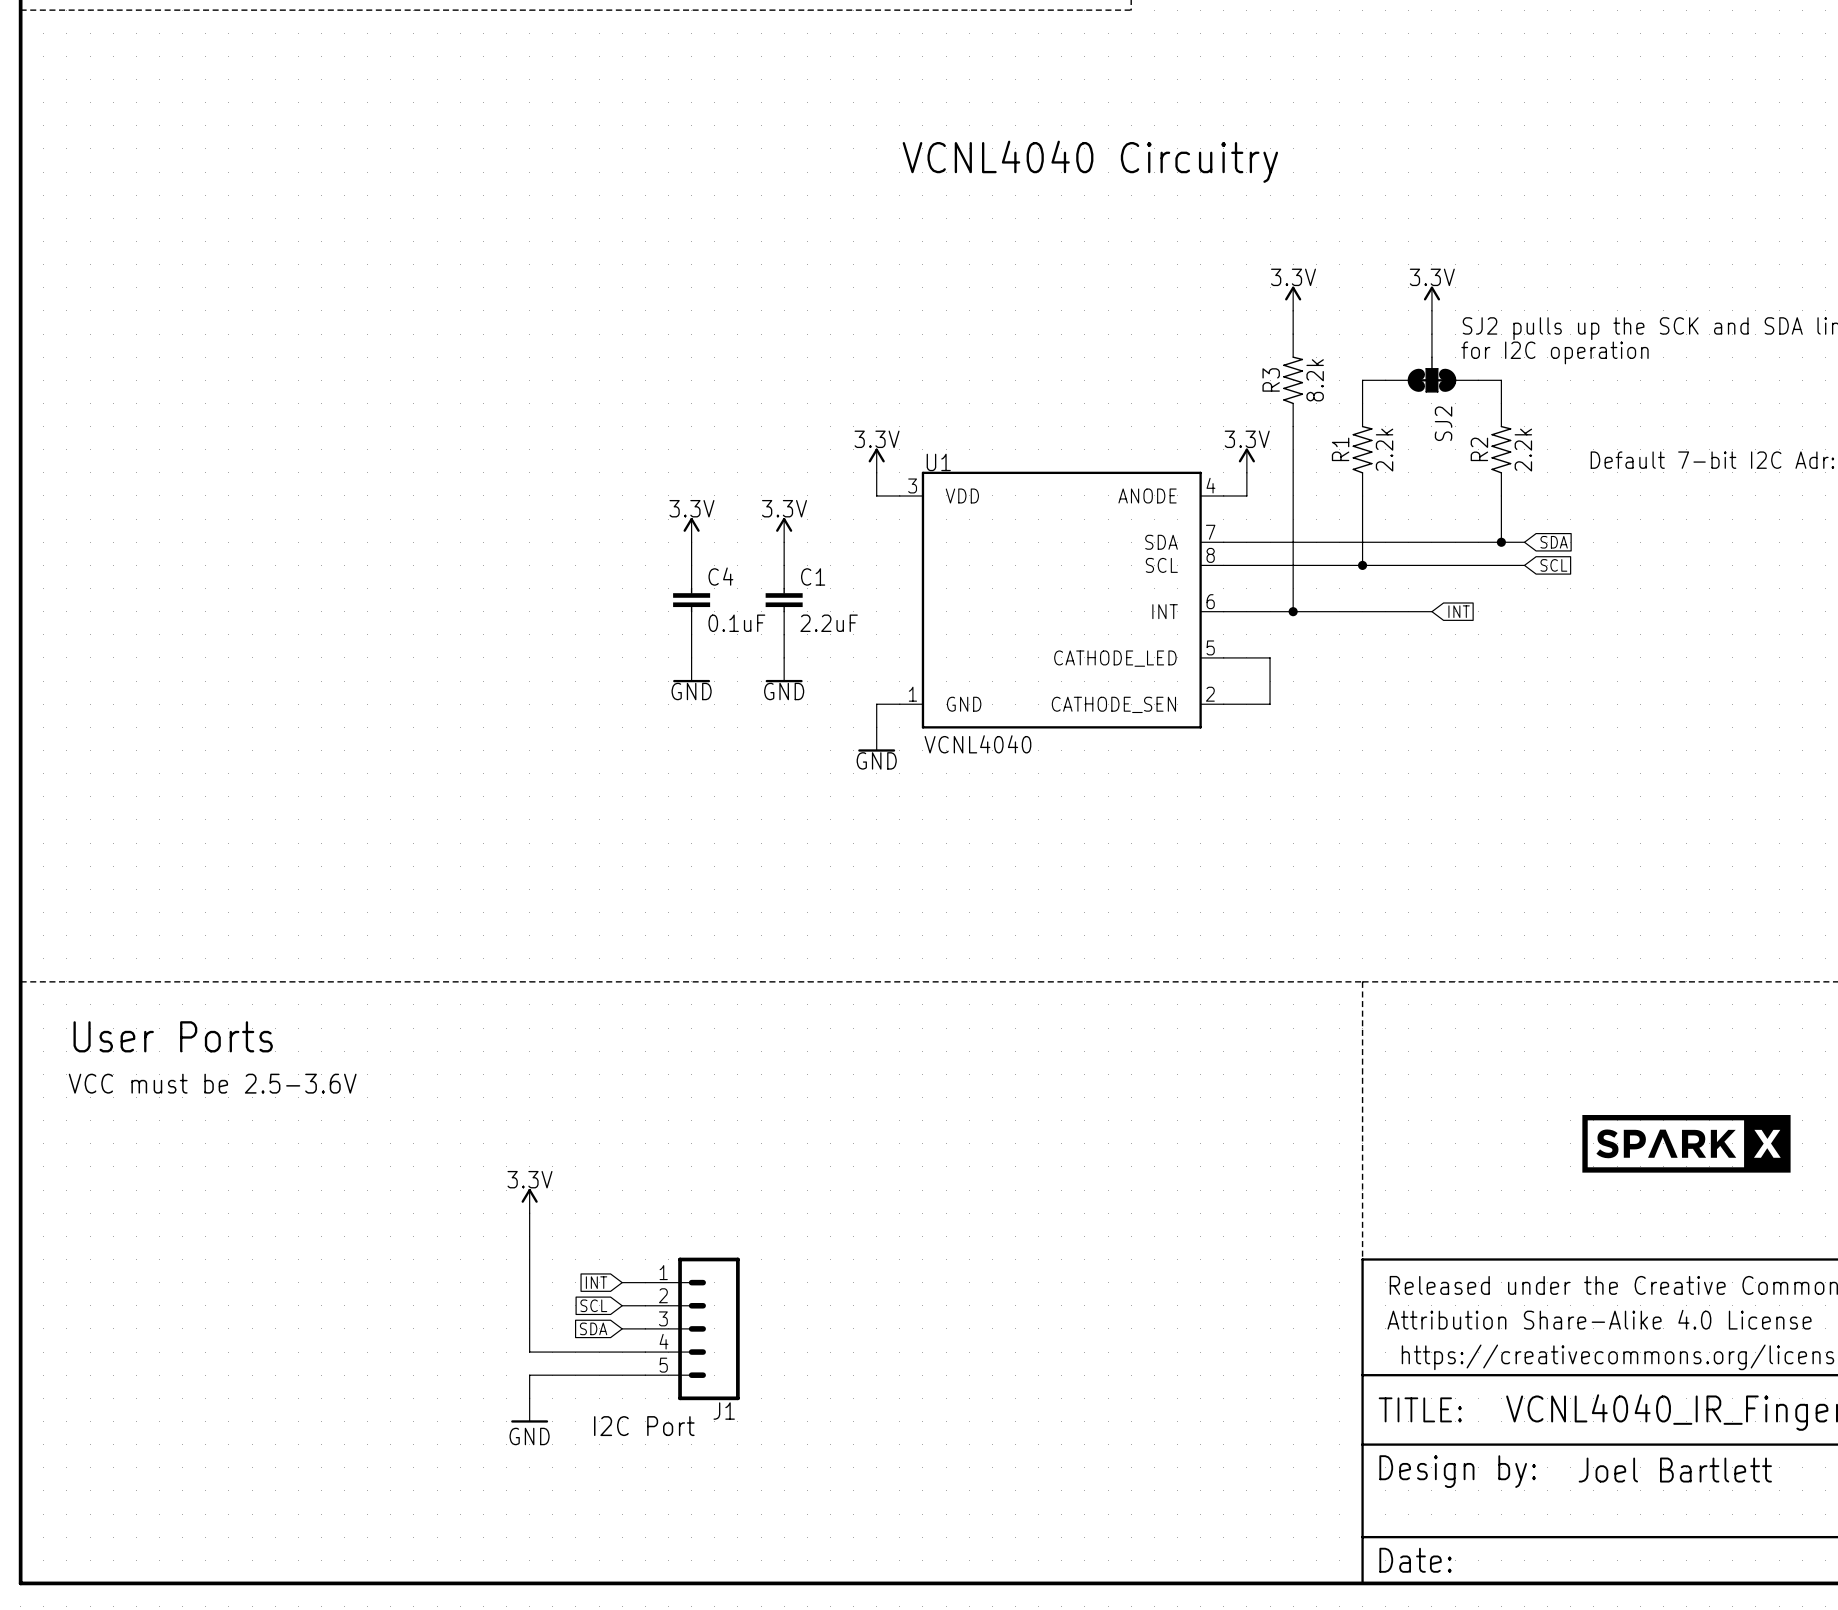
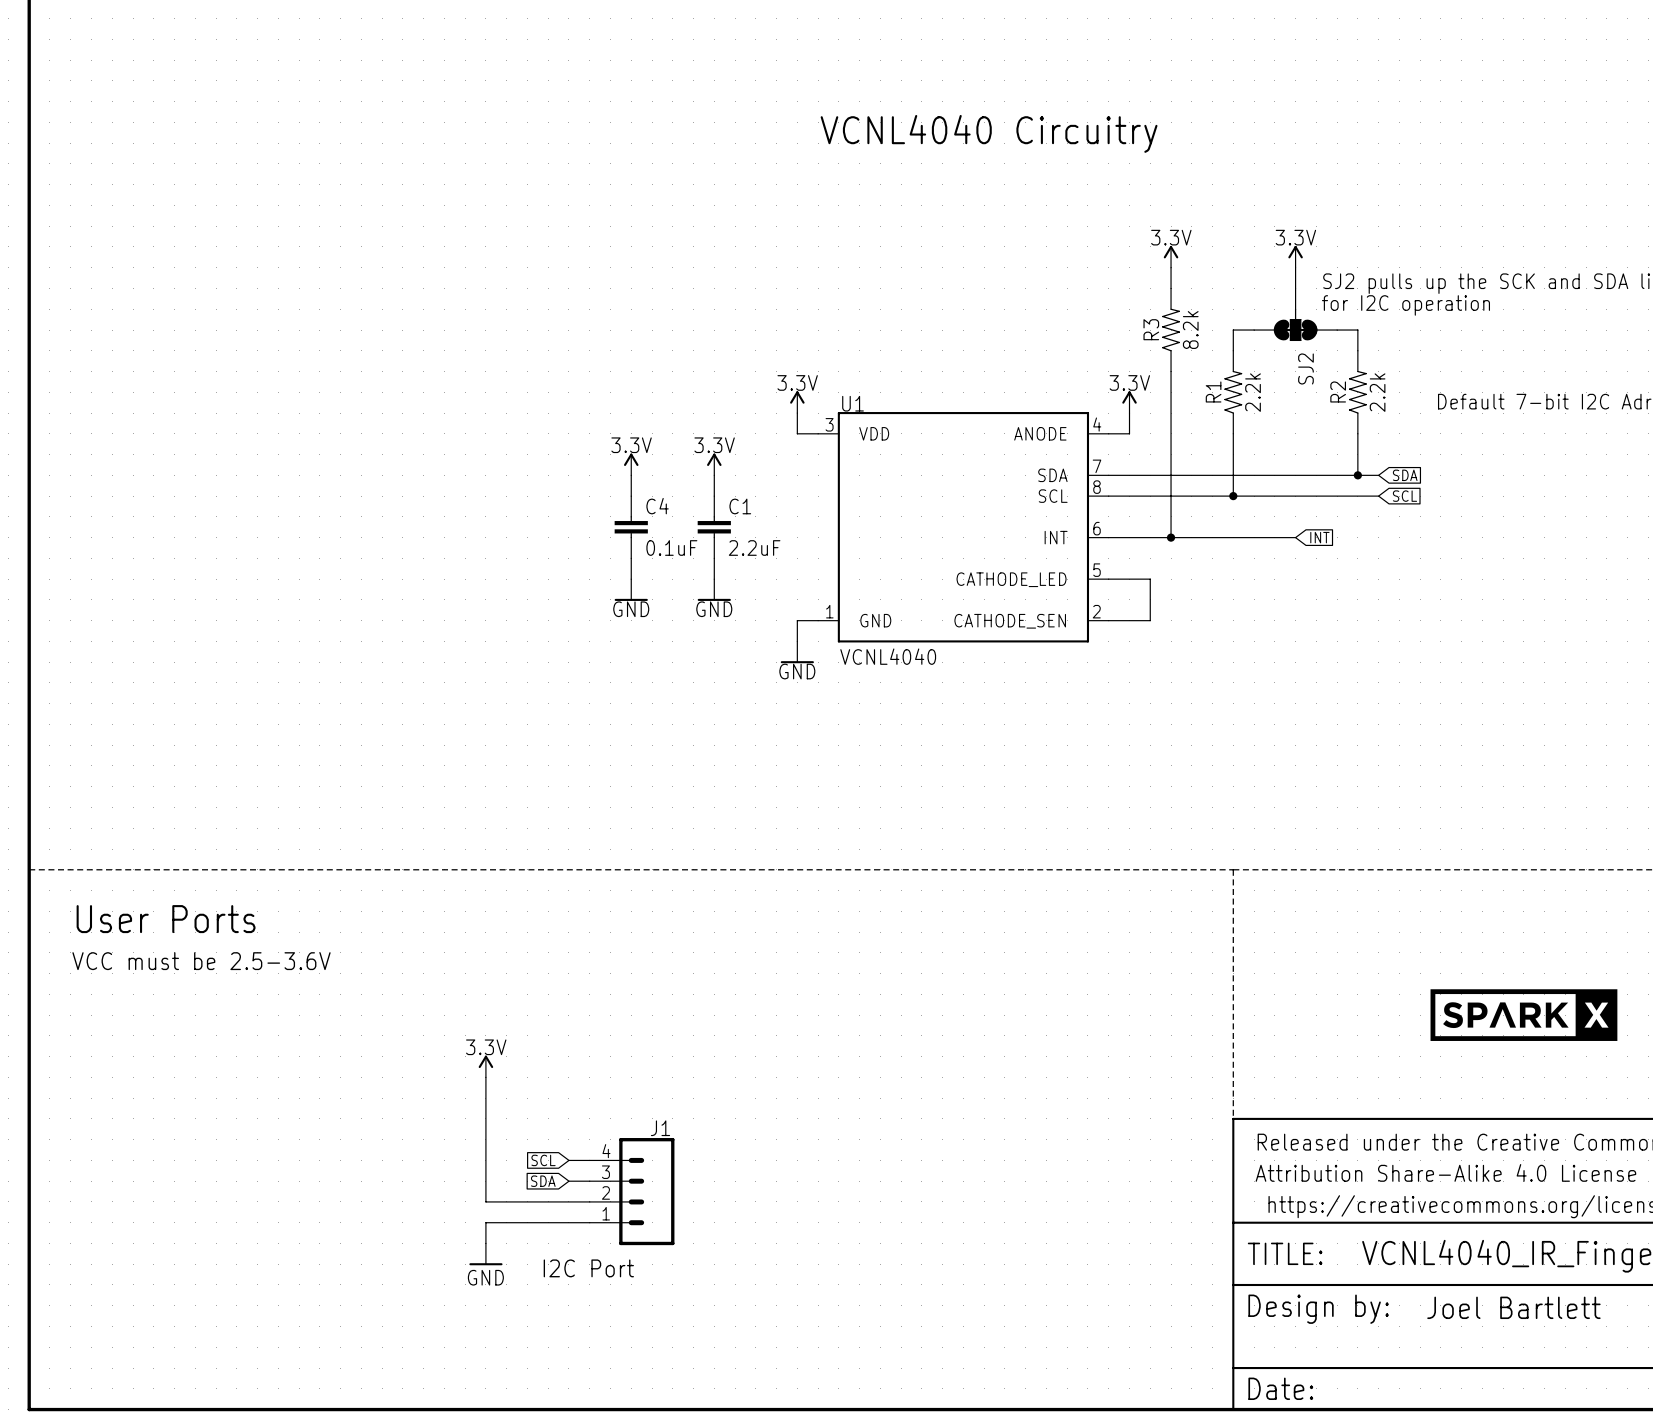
J1 symbol: [645, 1257, 740, 1401] -> [589, 1138, 675, 1246]
global label: INT (596, 1282) -> none
wire: (622, 1282) (645, 1282) -> none
J1 name position: J1 (724, 1411) -> J1 (660, 1128)

